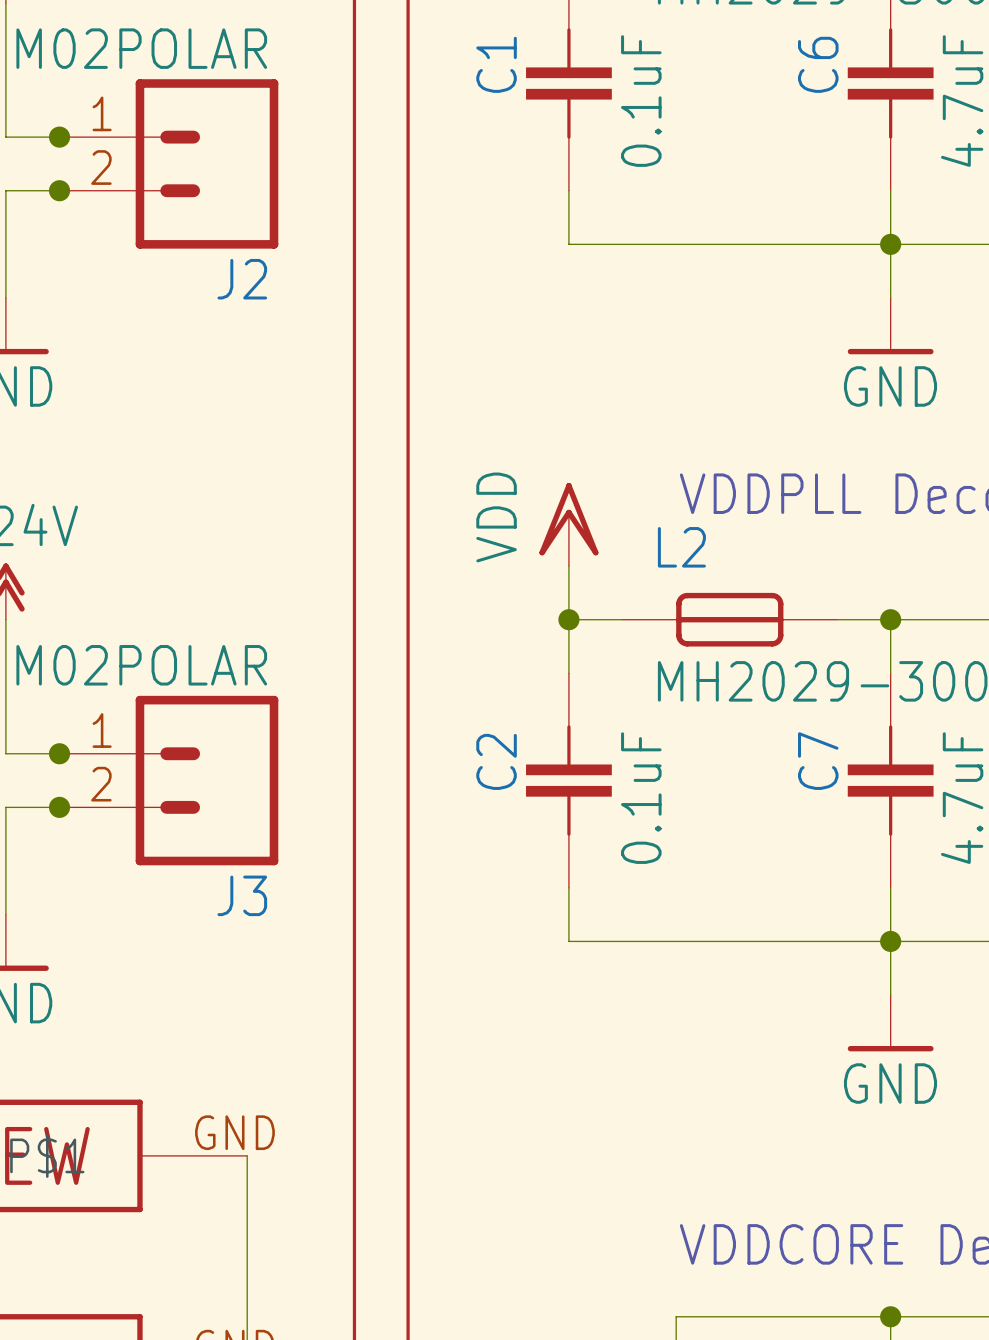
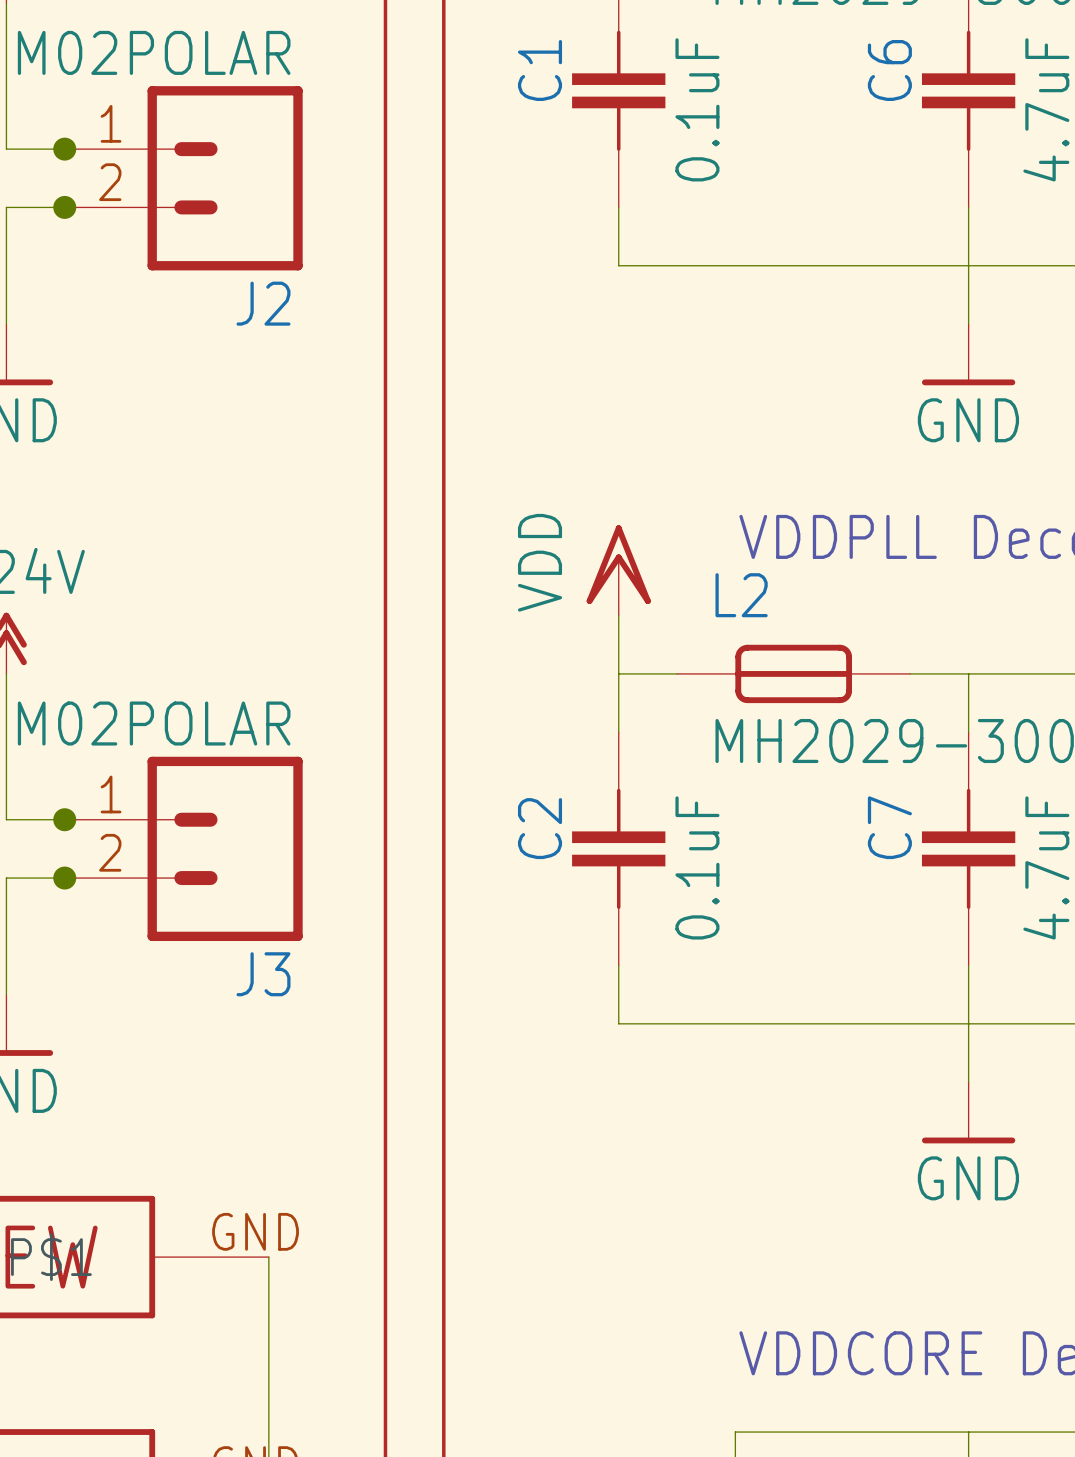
junction: (890, 244) -> none
junction: (568, 619) -> none
junction: (890, 619) -> none
junction: (890, 941) -> none
junction: (890, 1316) -> none

